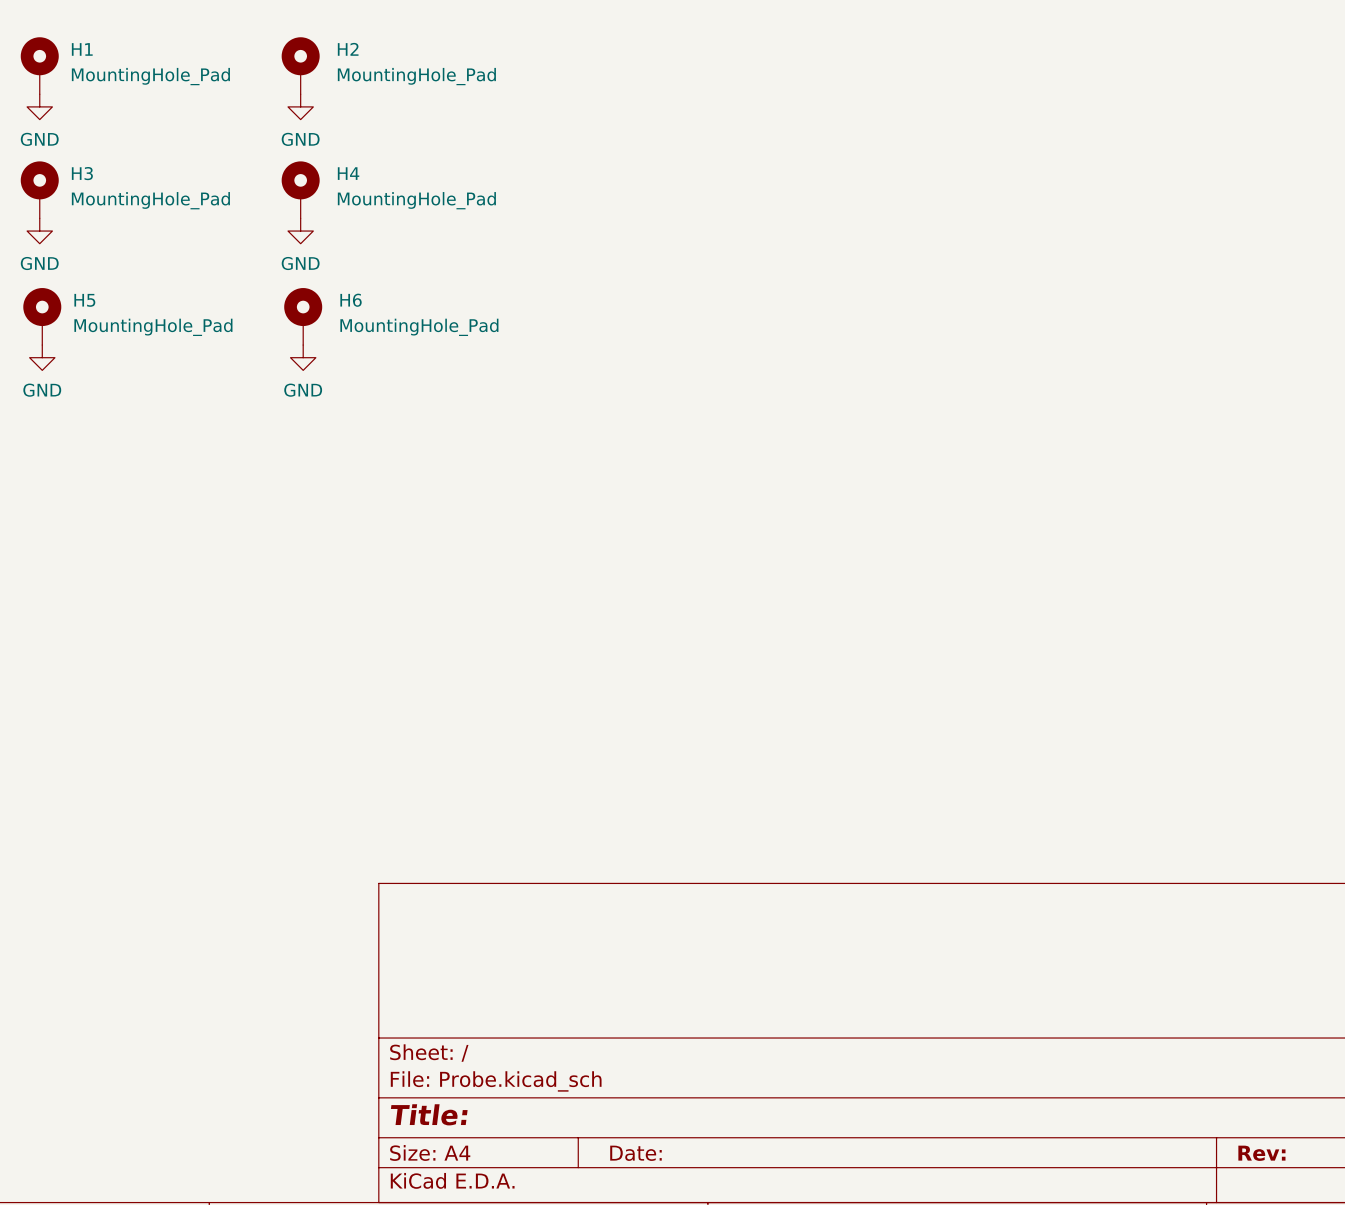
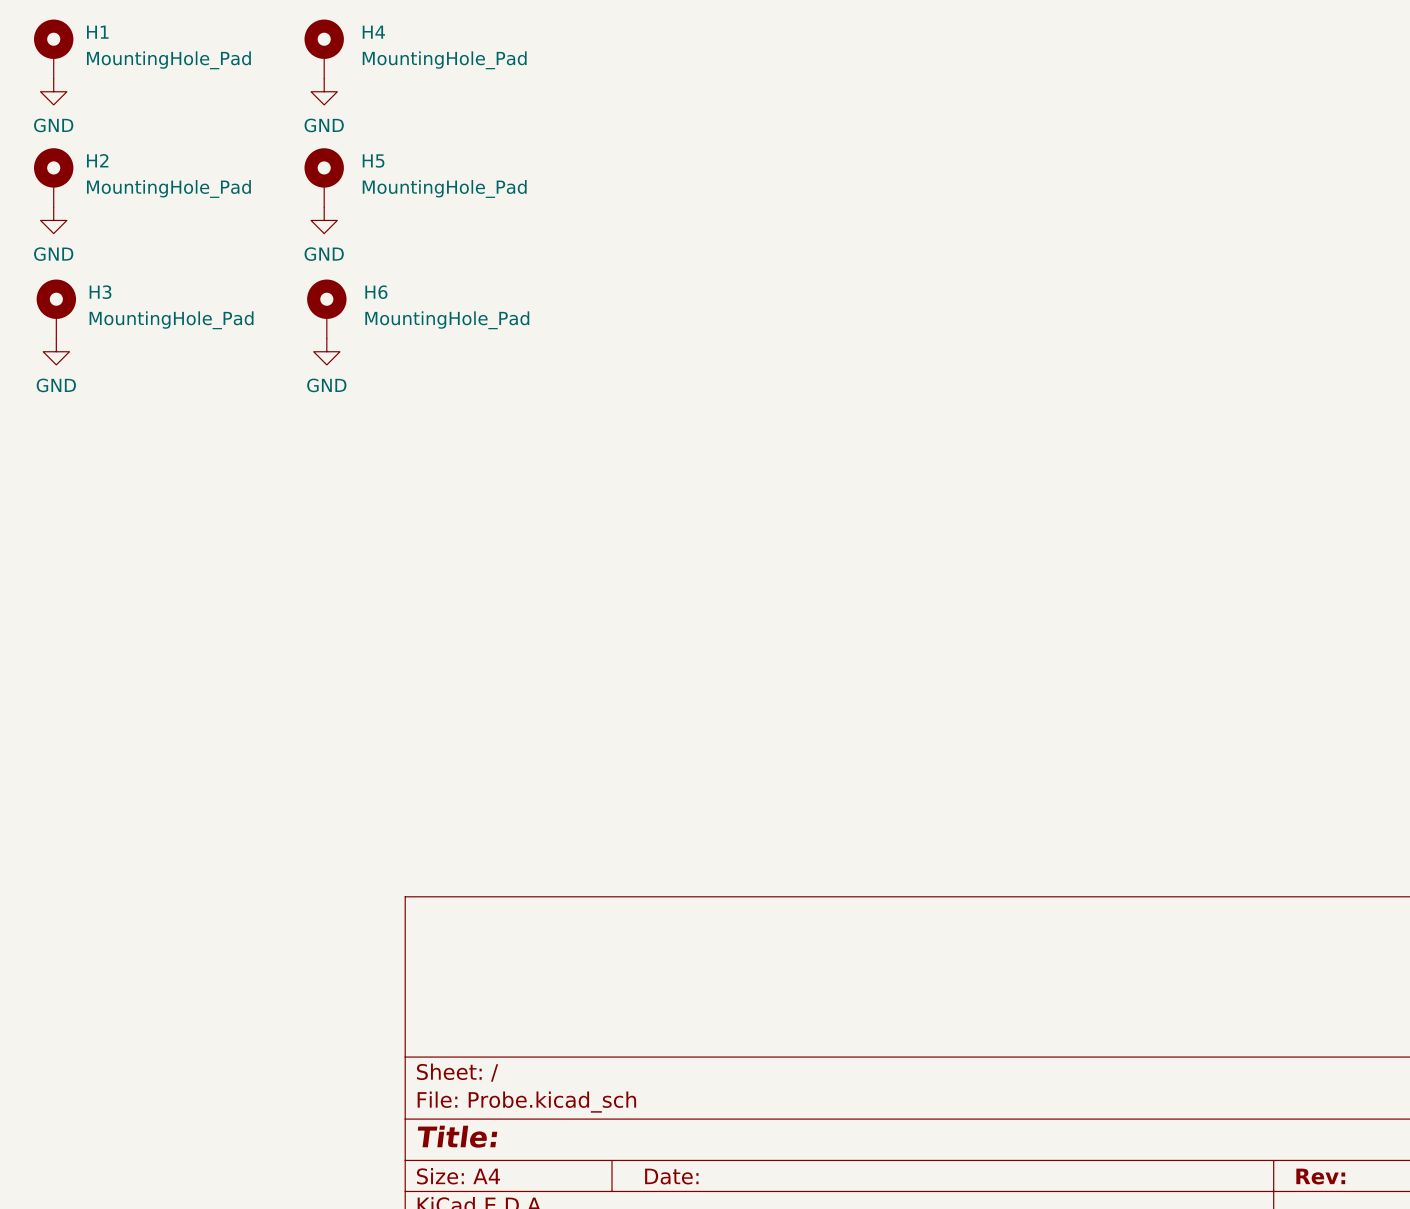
H2 name: H2 (348, 49) -> H4 (373, 32)
H3 name: H3 (82, 173) -> H2 (97, 160)
H4 name: H4 (348, 173) -> H5 (373, 161)
H5 name: H5 (84, 300) -> H3 (100, 292)

